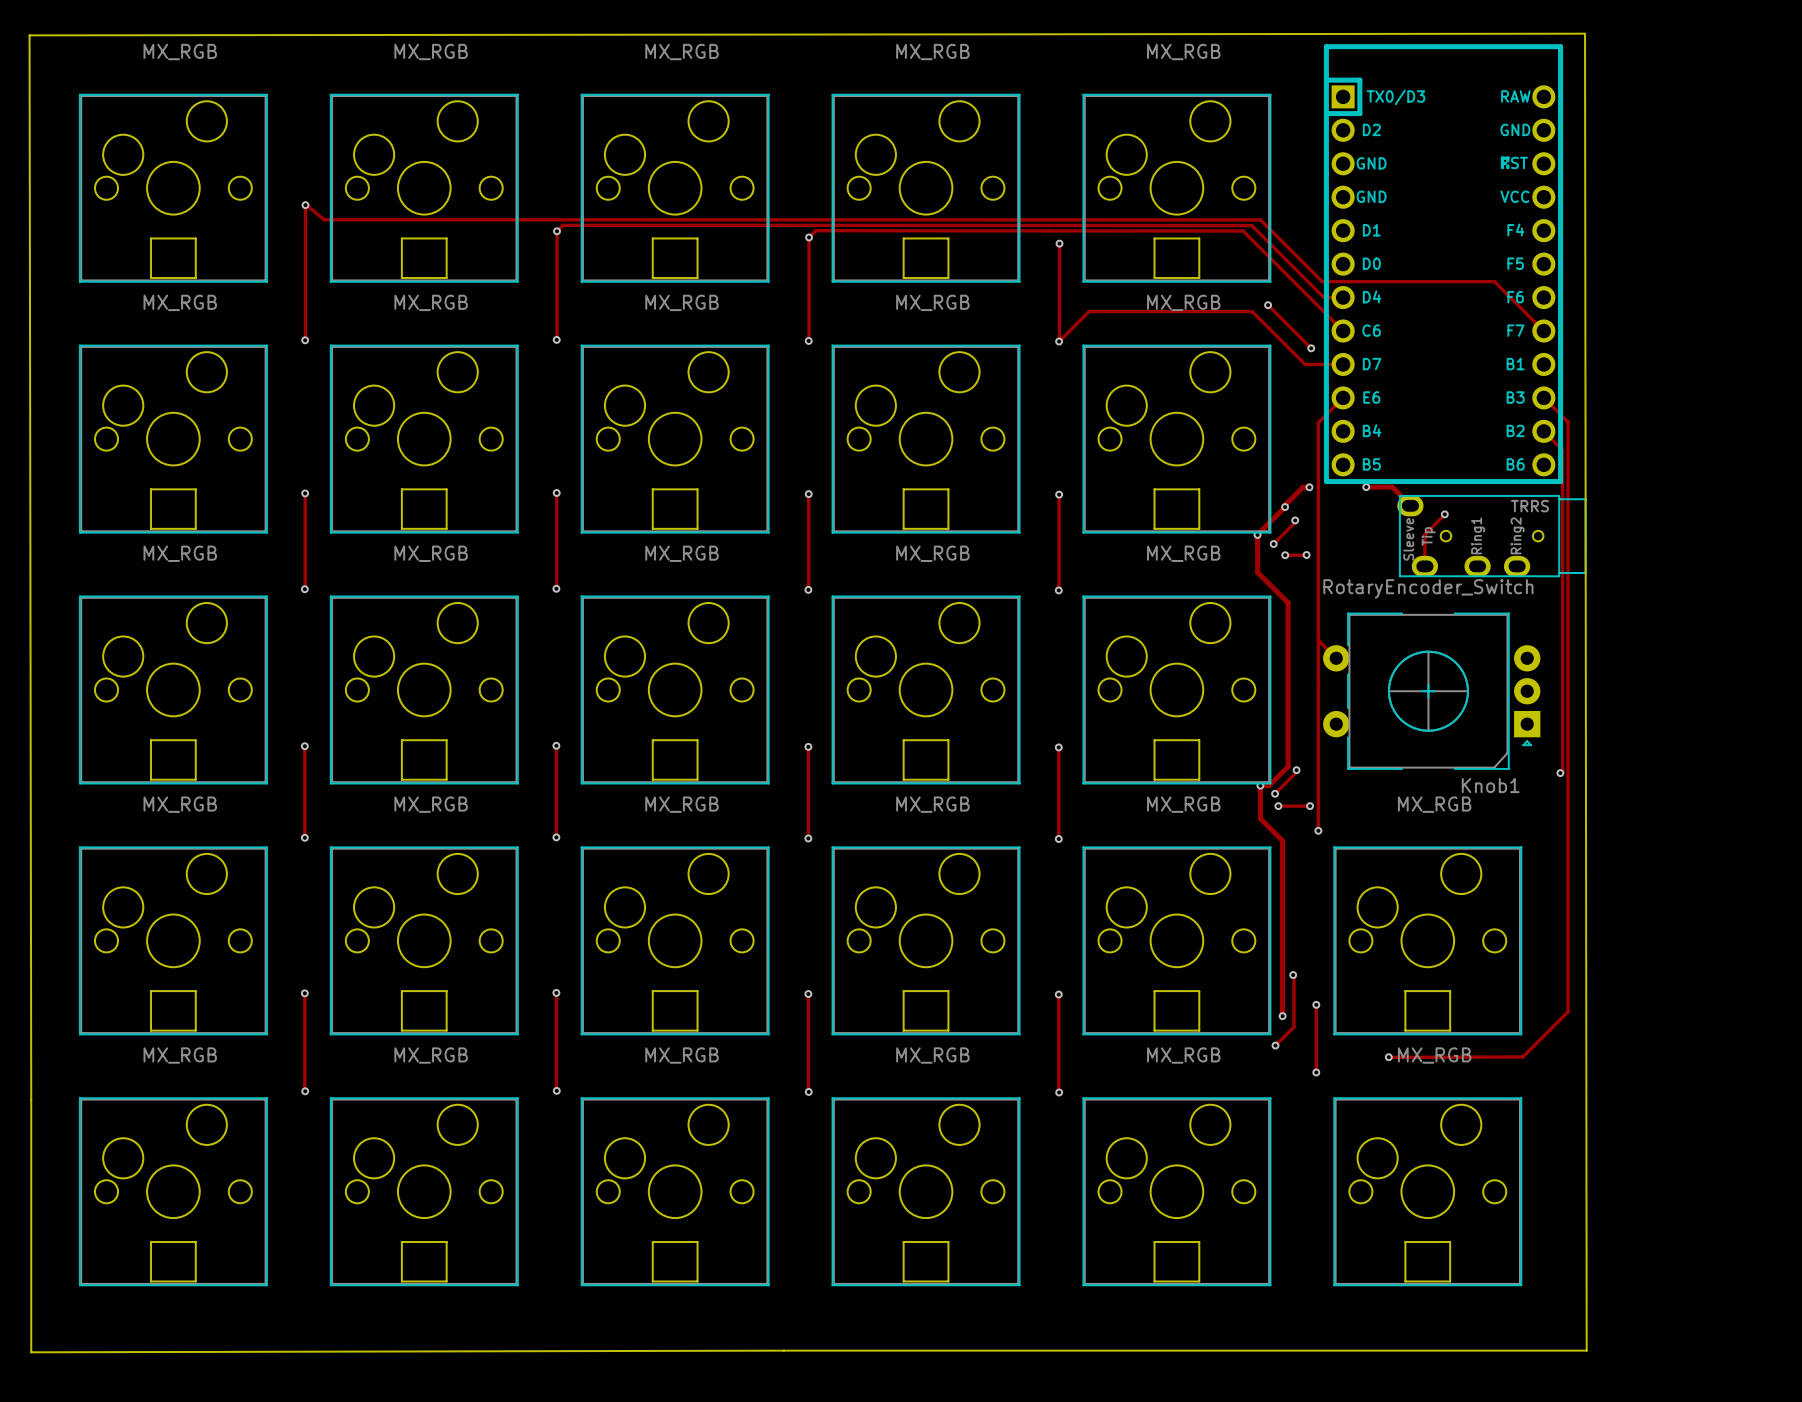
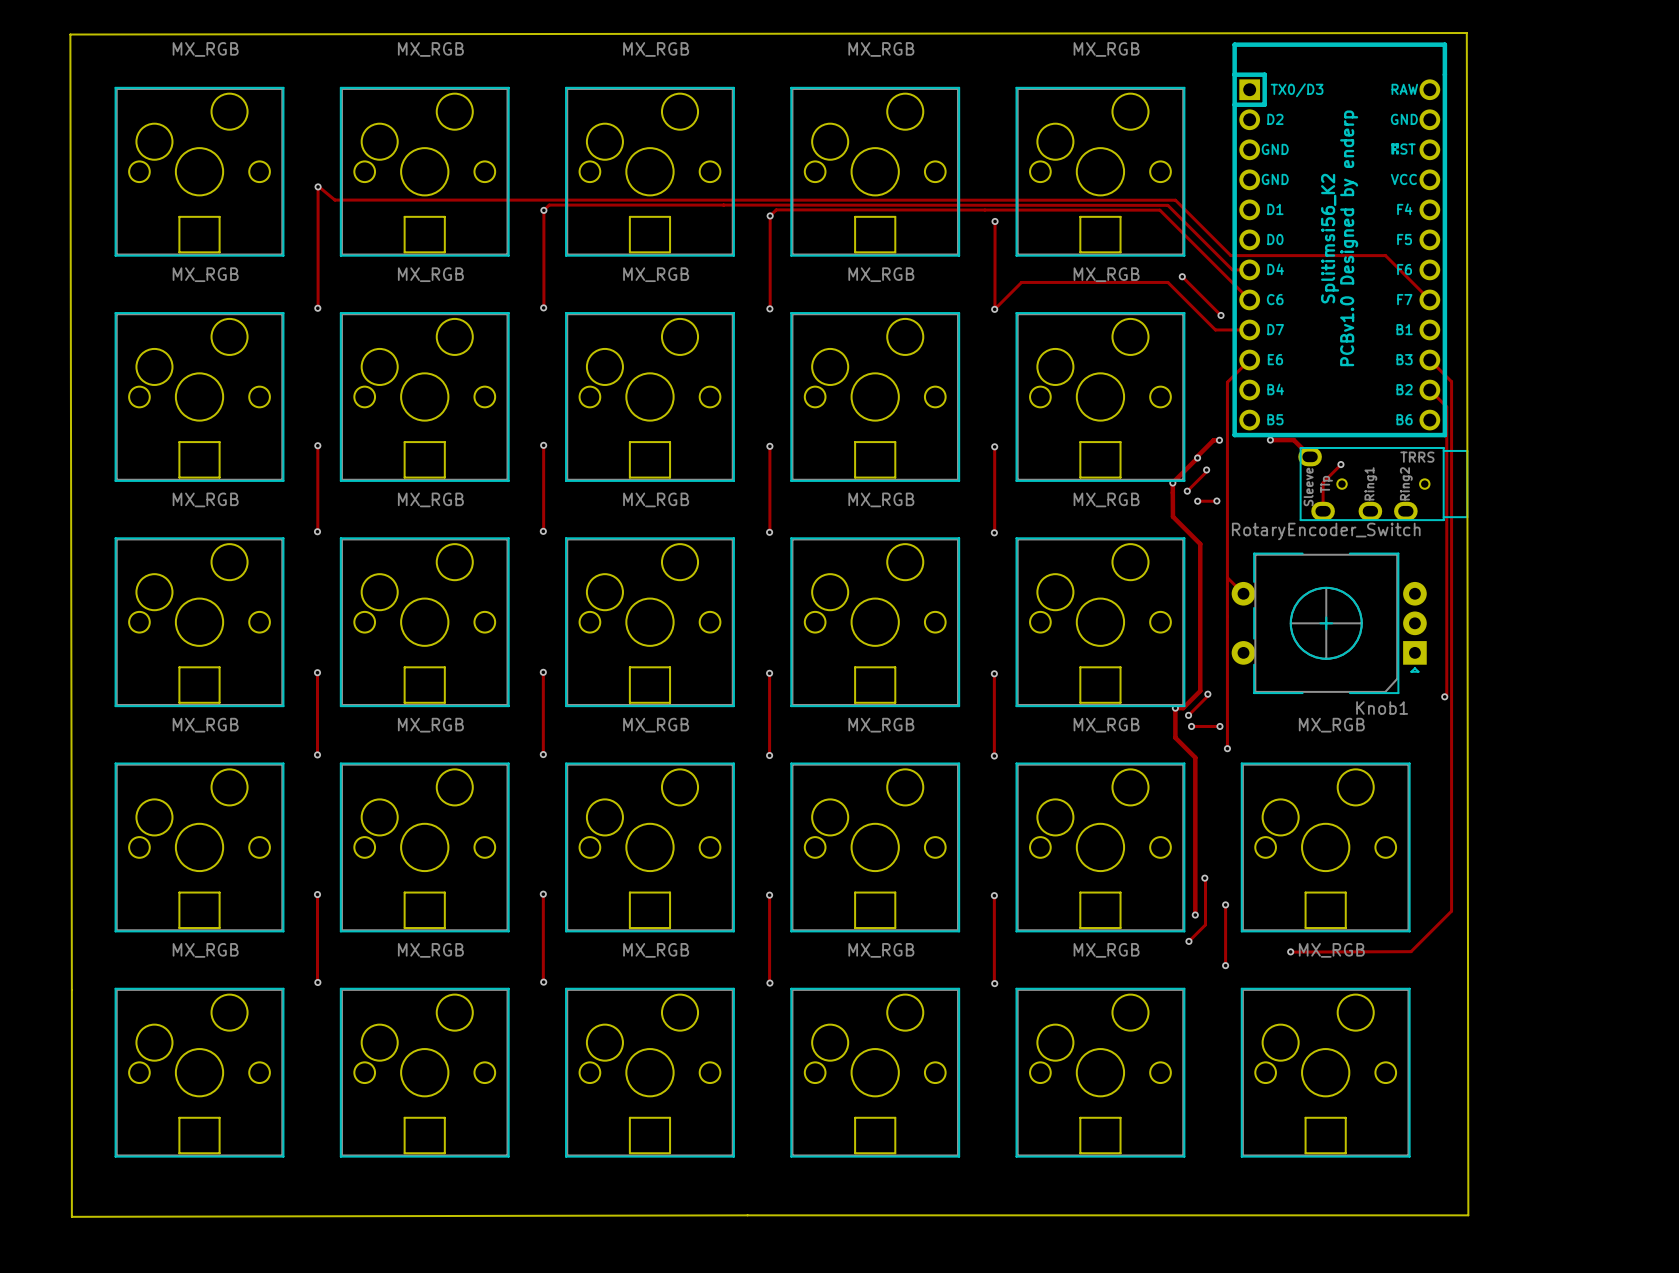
text: none -> Splitimsi56_K2 (1330, 238)
text: none -> PCBv1.0 Designed by enderp (1349, 238)

